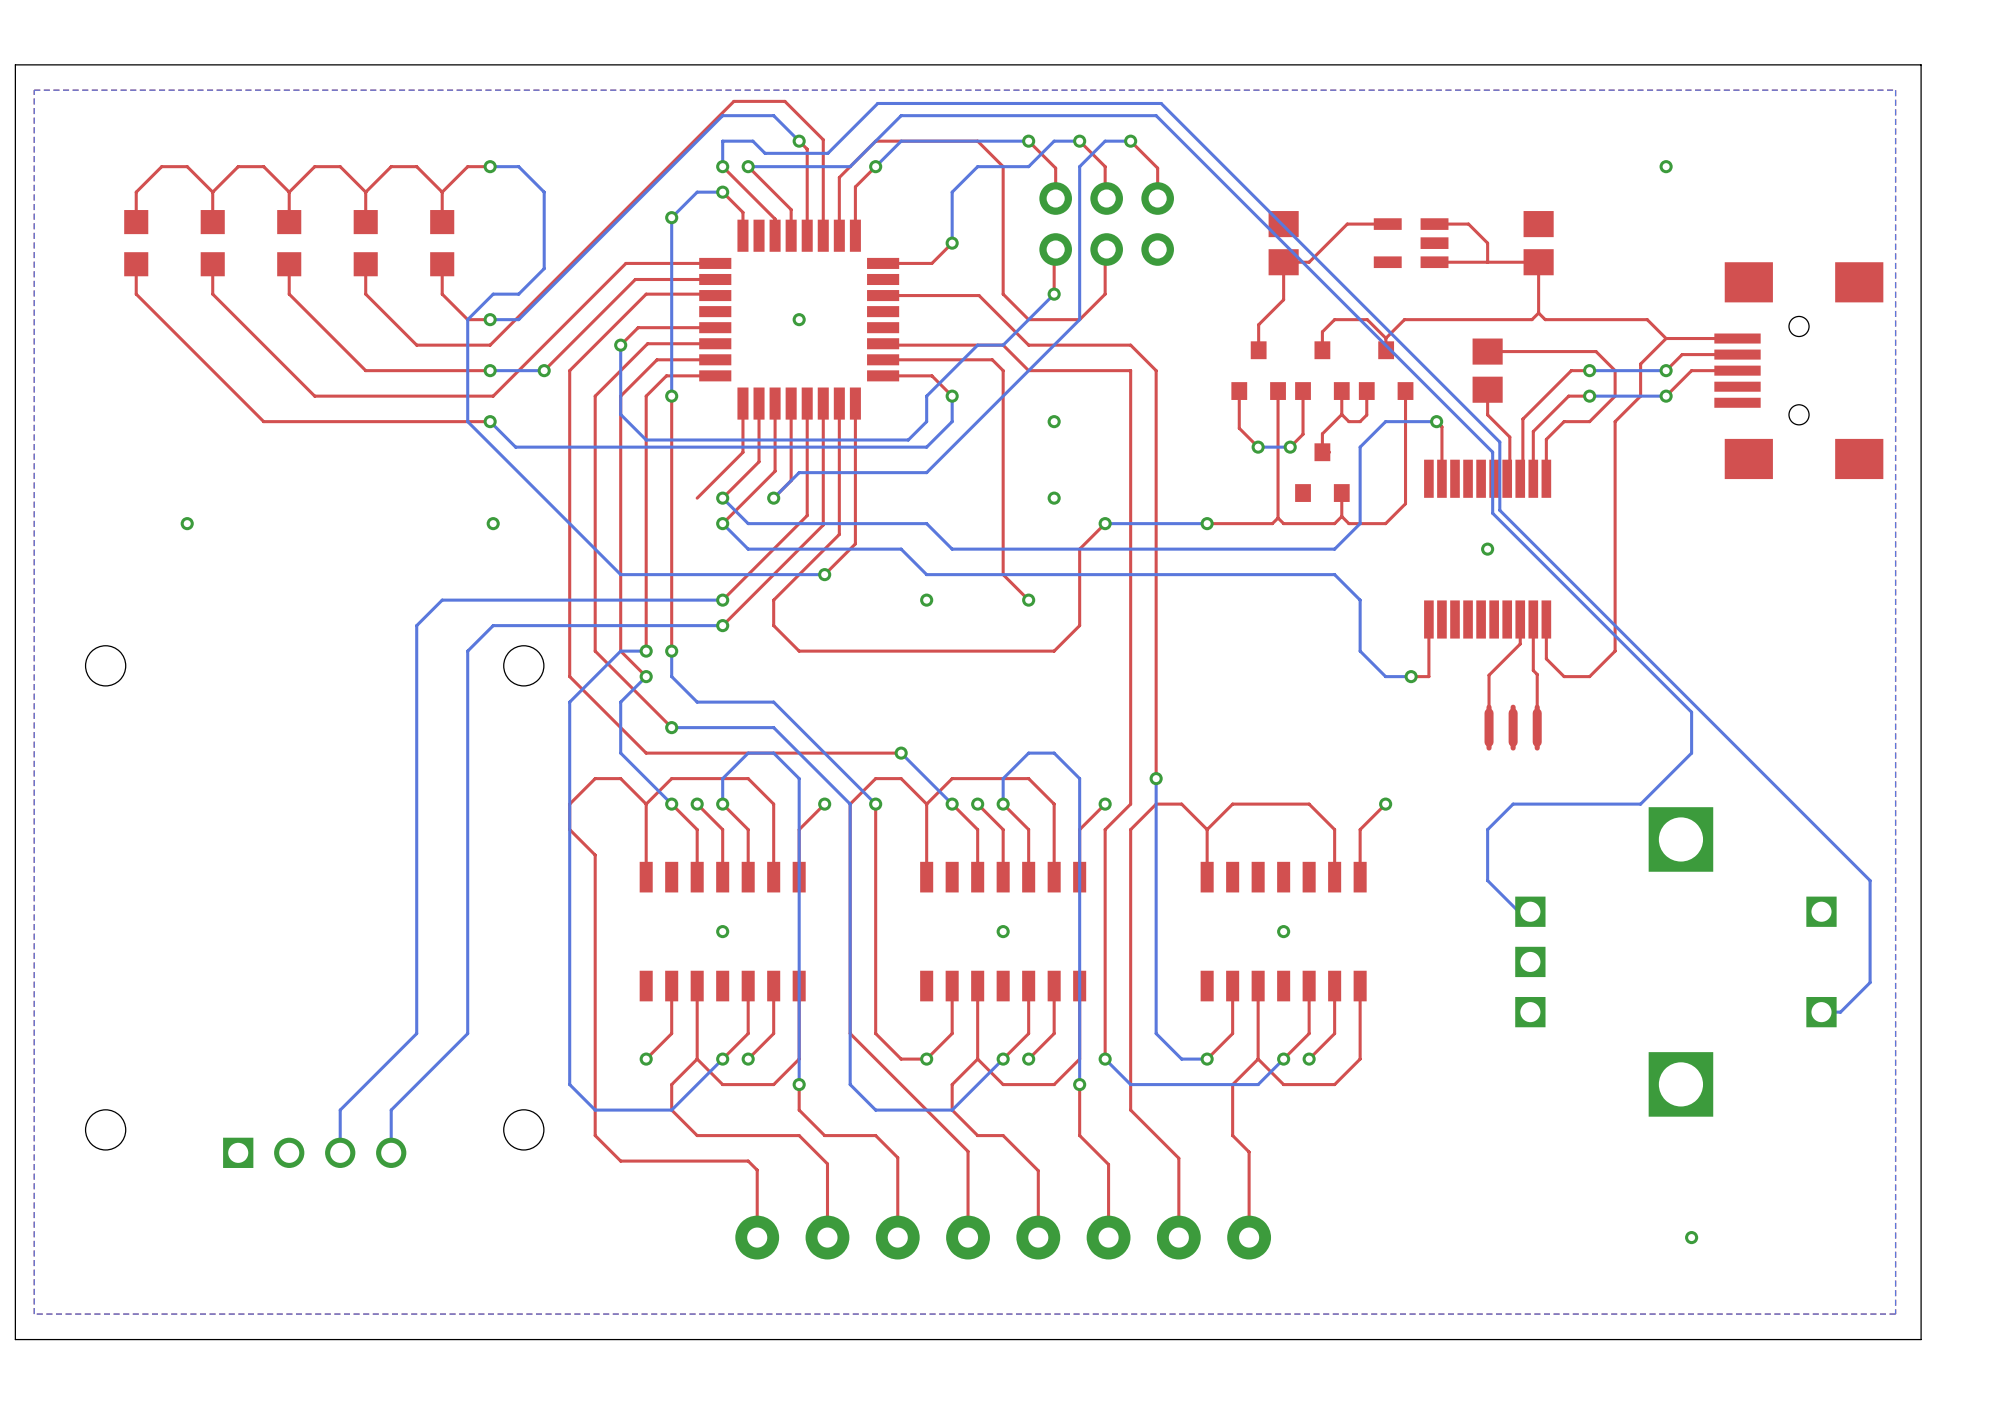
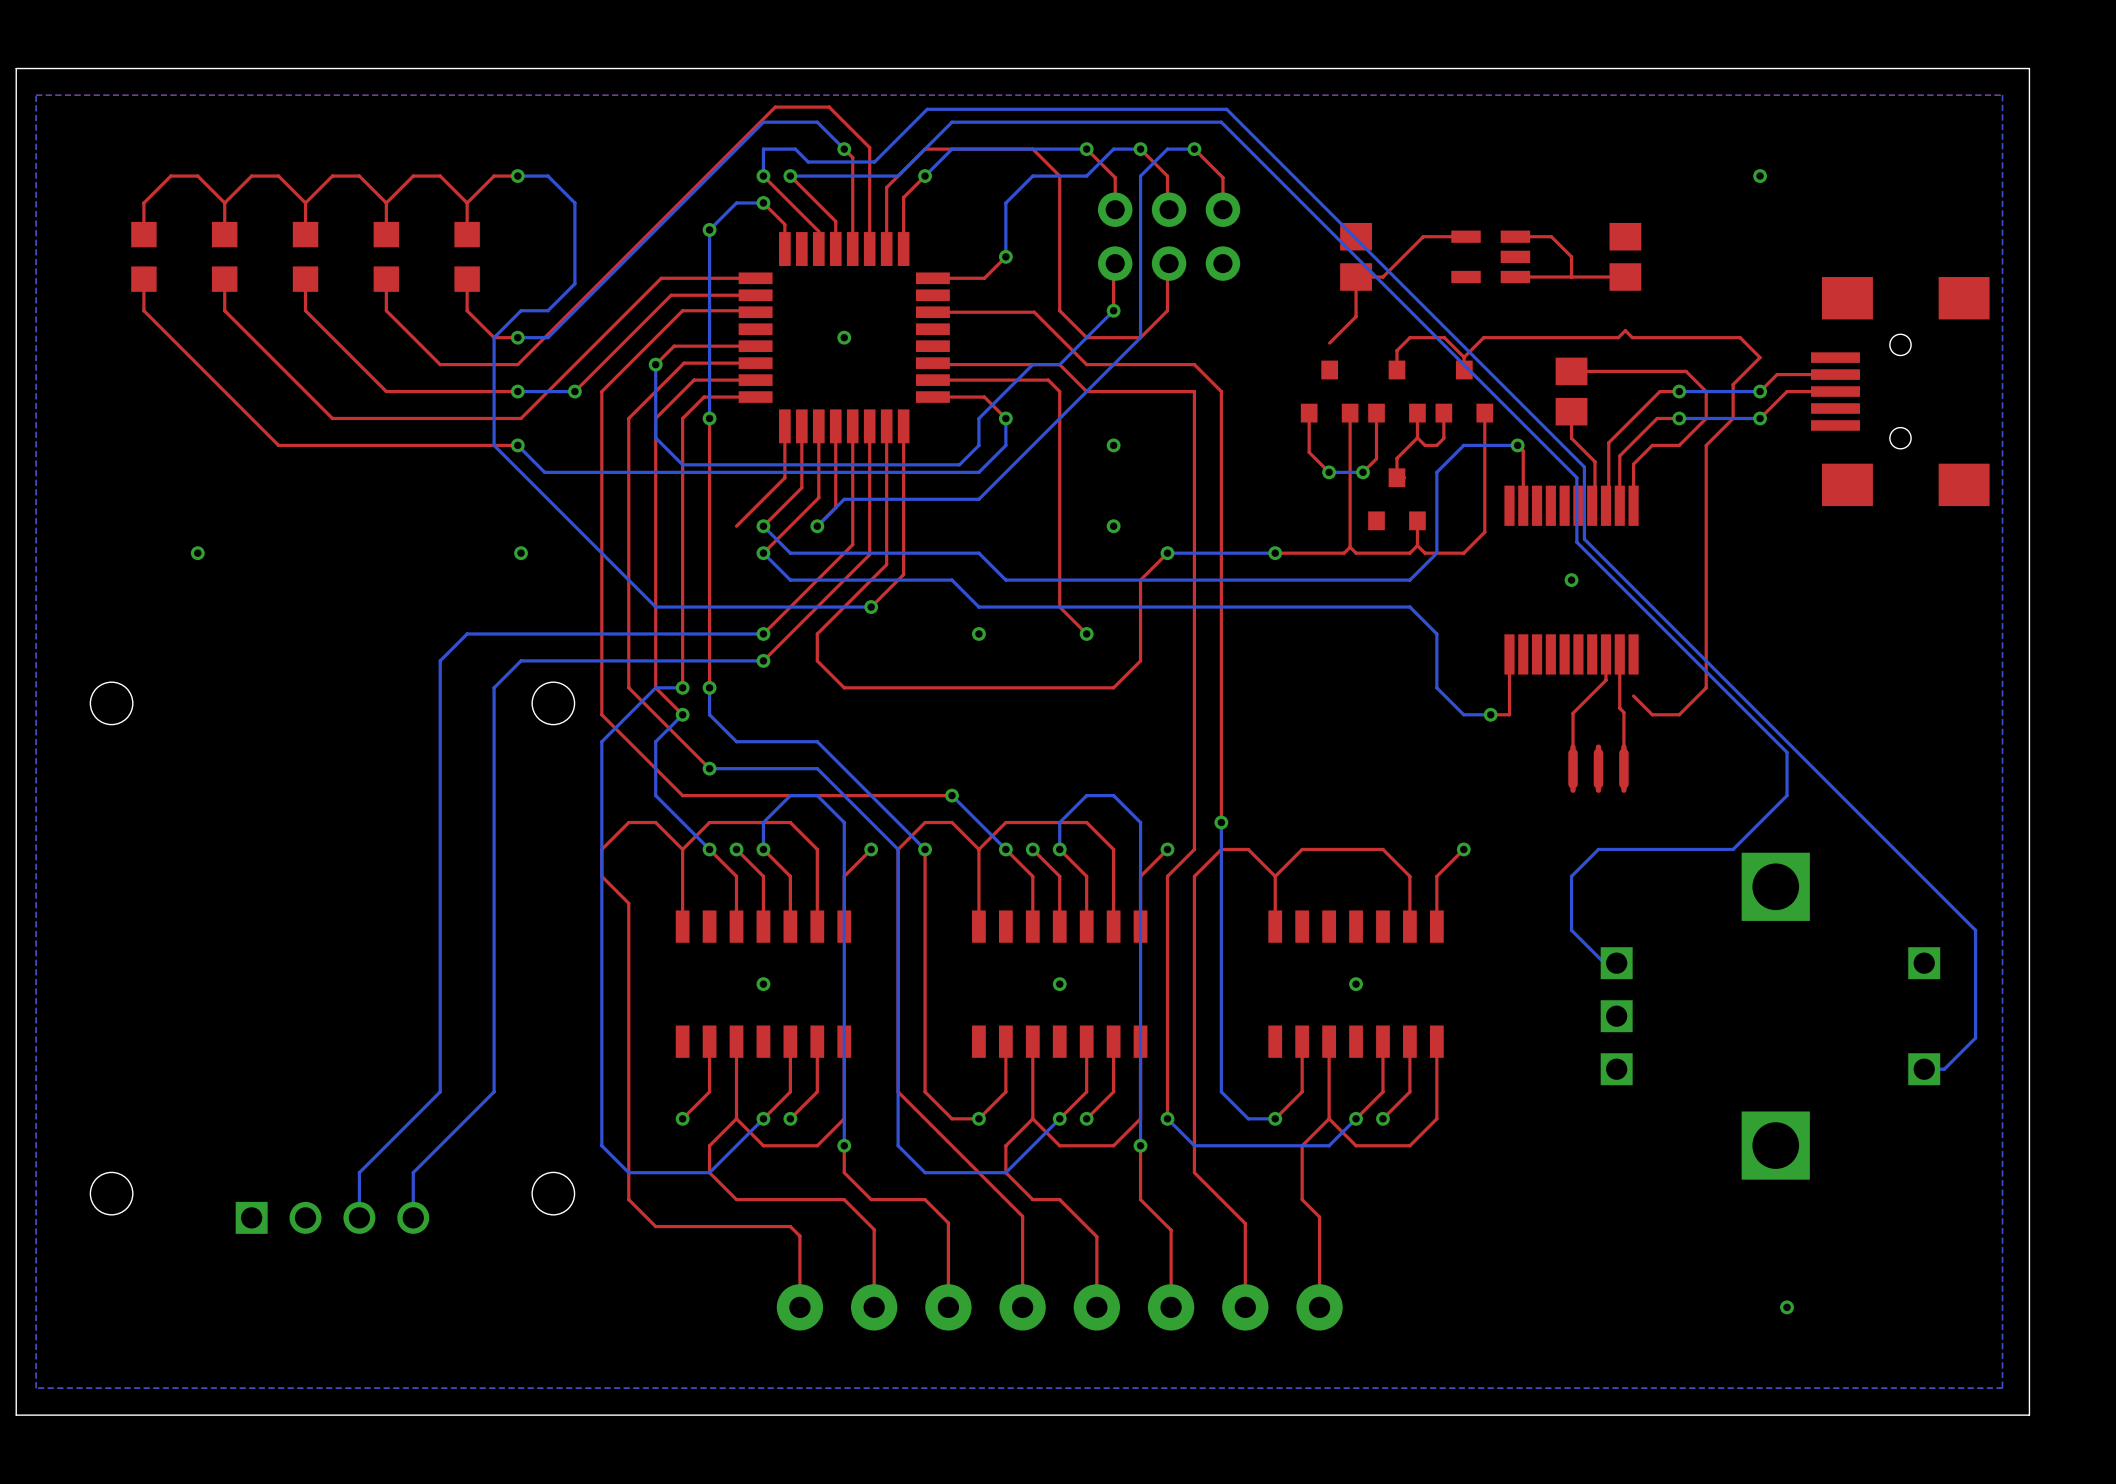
top track: (1538, 262) (1538, 313) -> none
top track: (1258, 324) (1258, 350) -> none
top track: (1737, 338) (1666, 338) -> none
top track: (1546, 619) (1546, 658) -> none

